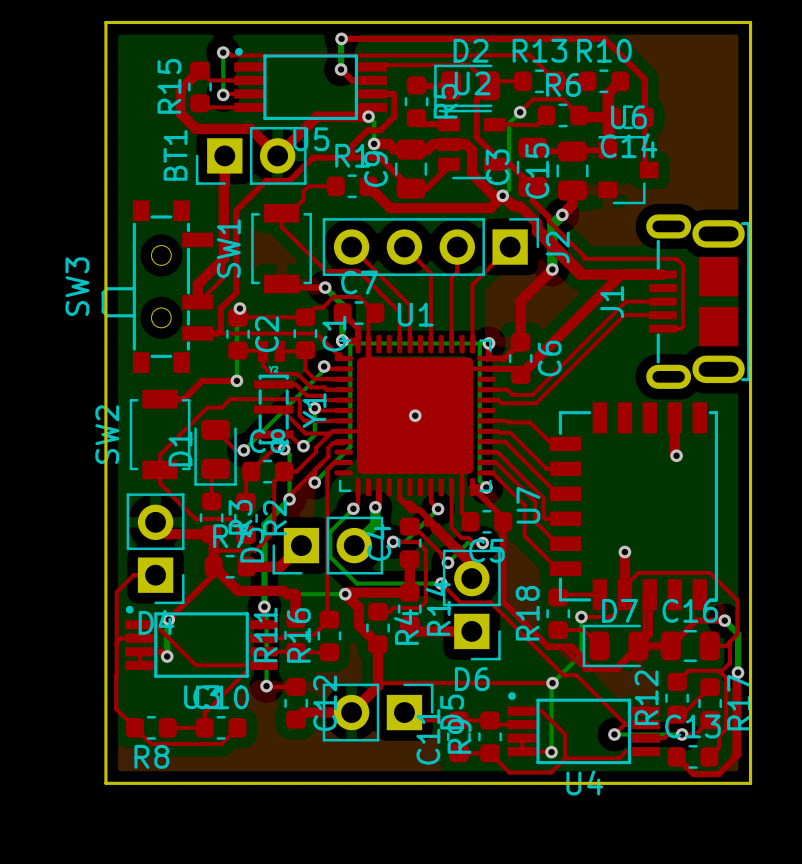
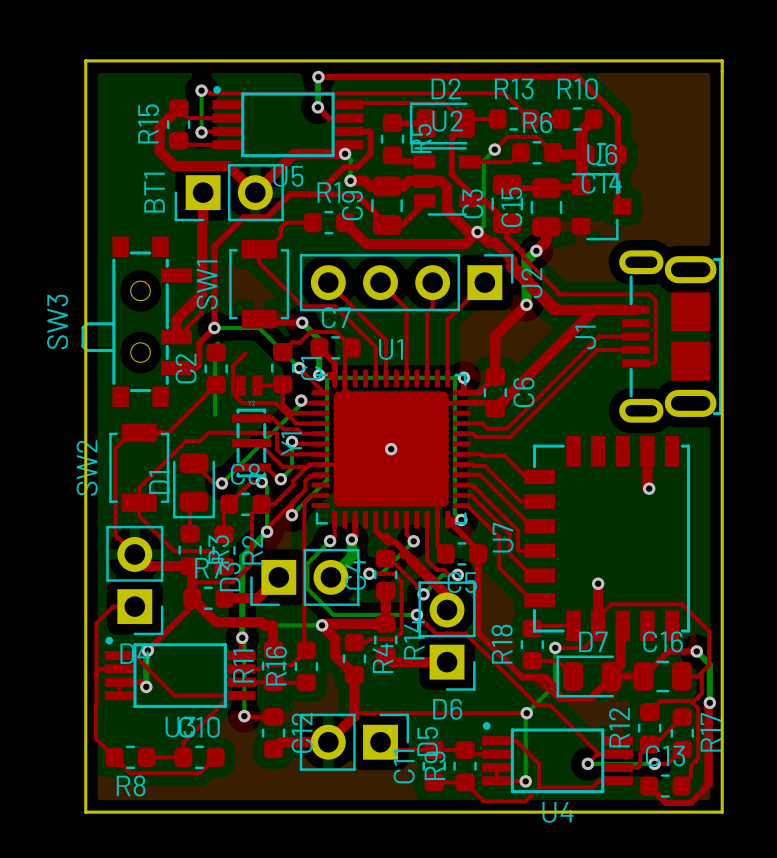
bottom track: none -> (214, 328) (259, 328) (299, 368)
top track: (239, 308) (239, 317) (238, 317) (305, 317) -> none
via position: (239, 308) -> (214, 328)
top track: (217, 333) (316, 333) (343, 358) -> (299, 368) (320, 389) (320, 392)
via: none -> (299, 368)
C2 name position: C2 (266, 334) -> C2 (186, 368)
top track: (238, 350) (262, 350) (263, 365) (271, 374) (297, 374) (311, 387) (324, 387) (326, 389) -> (245, 353) (233, 365) (233, 393) (242, 402) (275, 402) (296, 423) (303, 423)
top track: (236, 380) (202, 380) (183, 399) -> (216, 384) (168, 432) (162, 432)
via: (236, 380) -> none
top track: none -> (139, 432) (131, 432) (115, 448) (115, 535) (134, 554)

